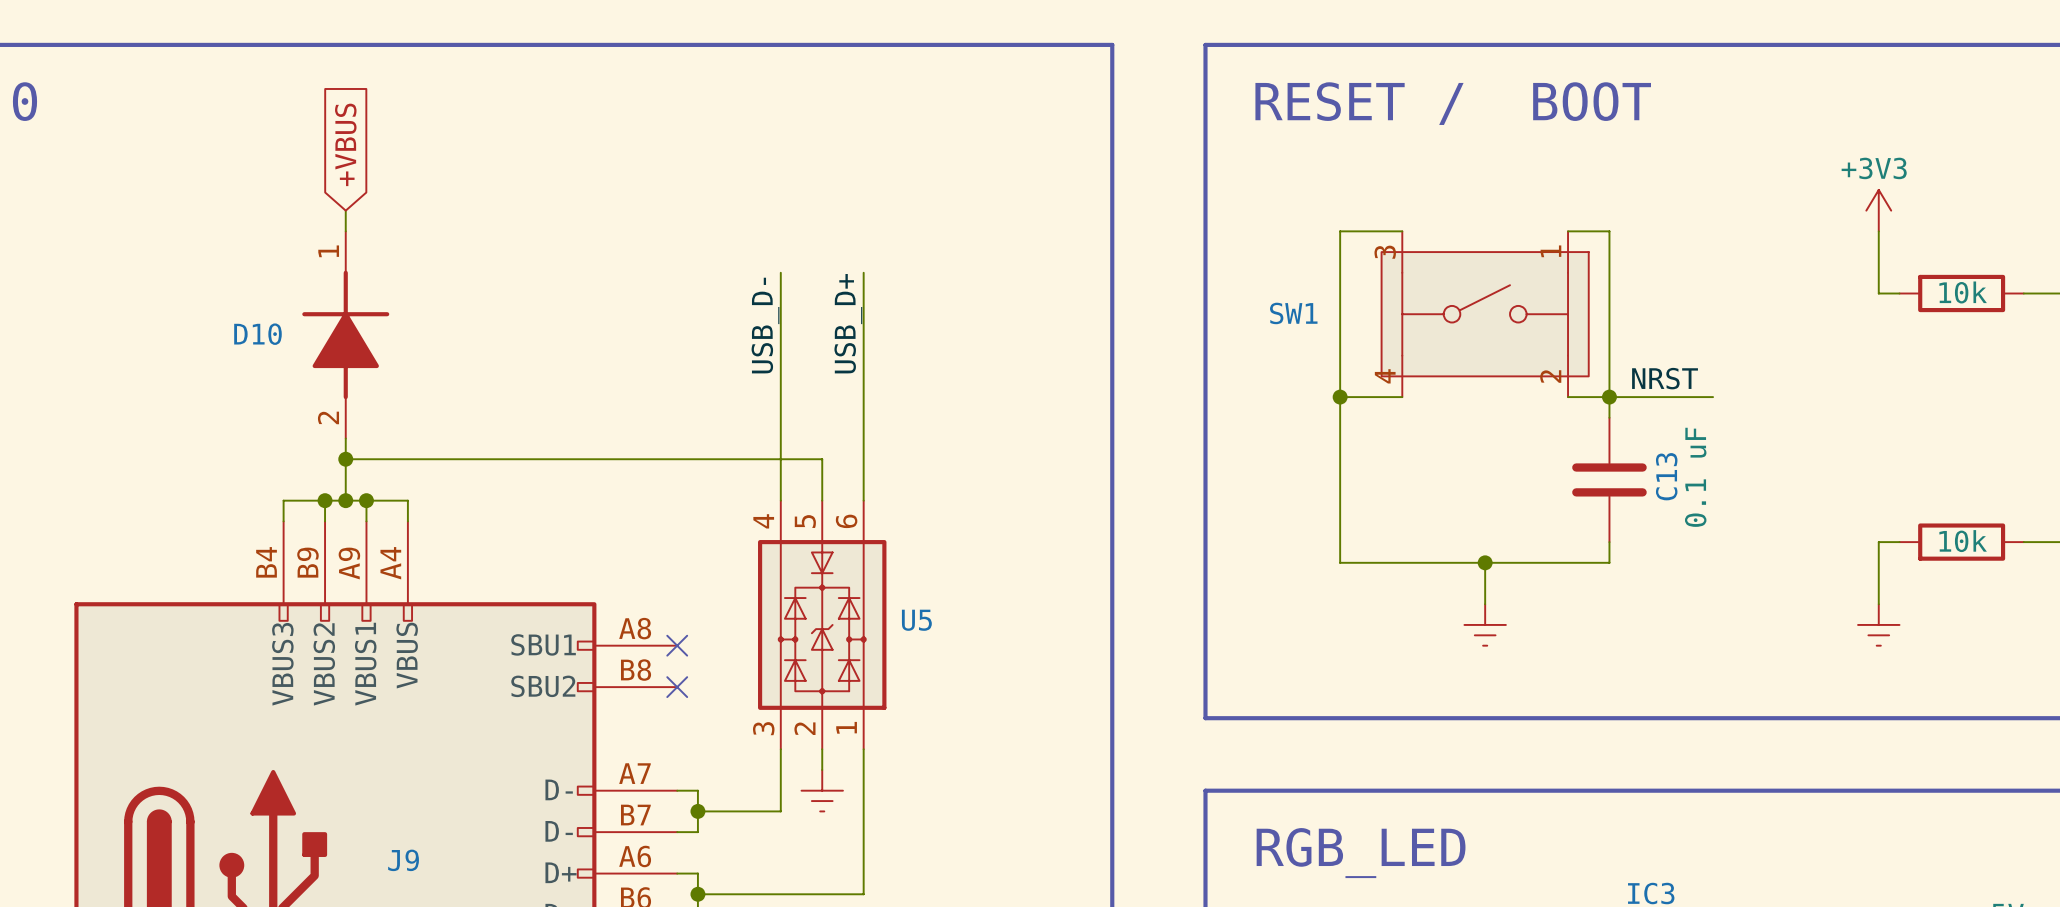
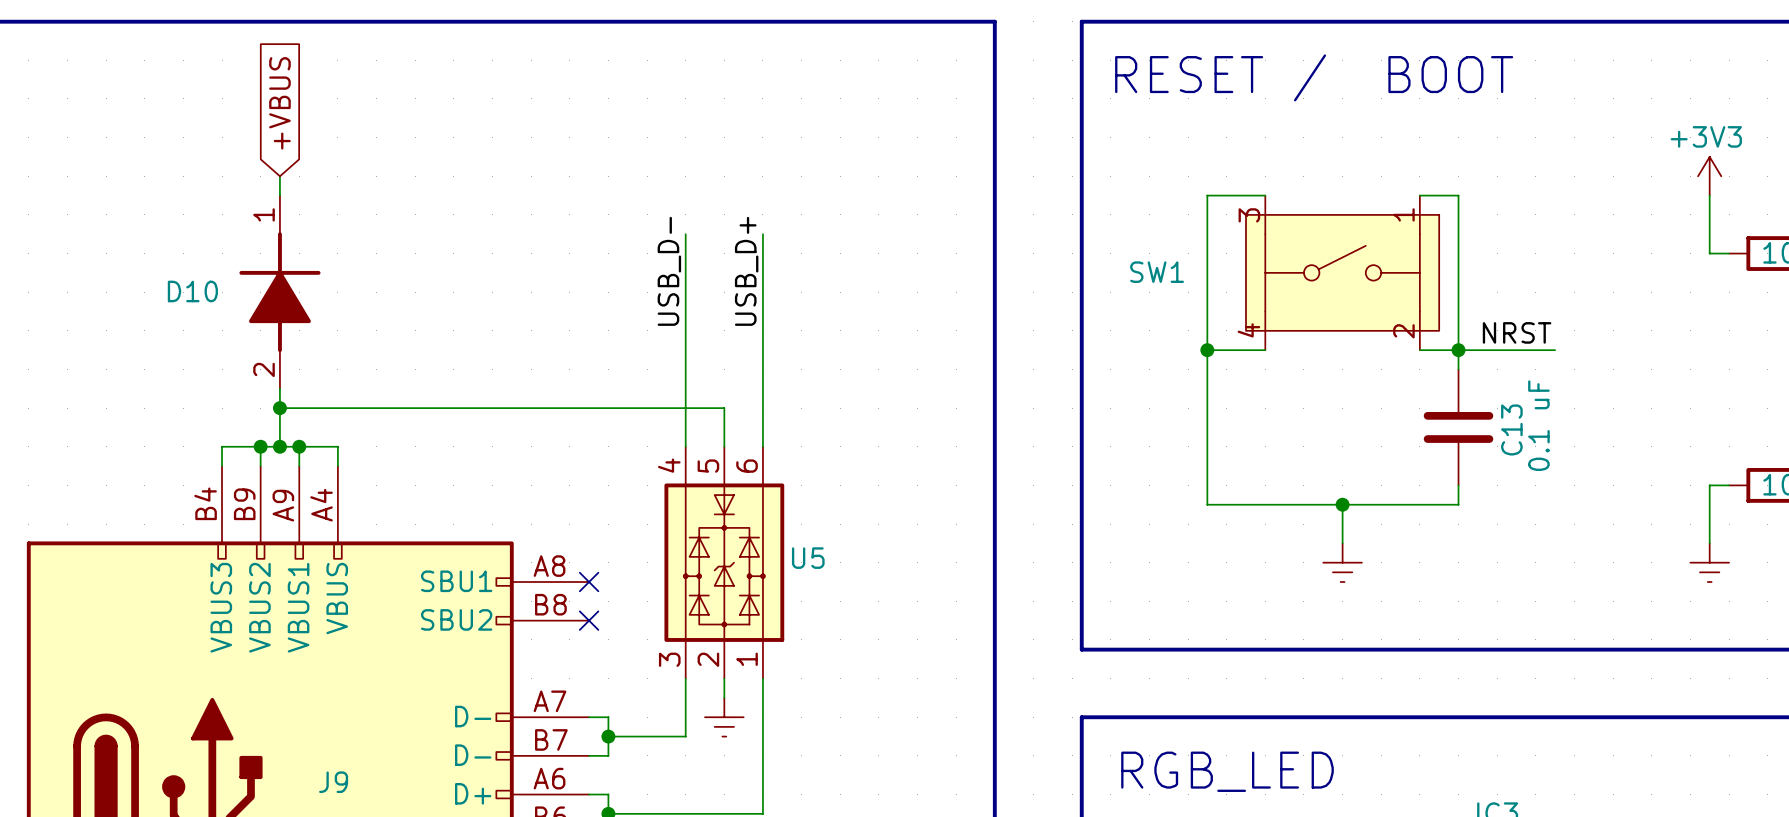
label position: USB_D+ (848, 323) -> USB_D+ (746, 271)
label position: USB_D- (765, 325) -> USB_D- (669, 271)

